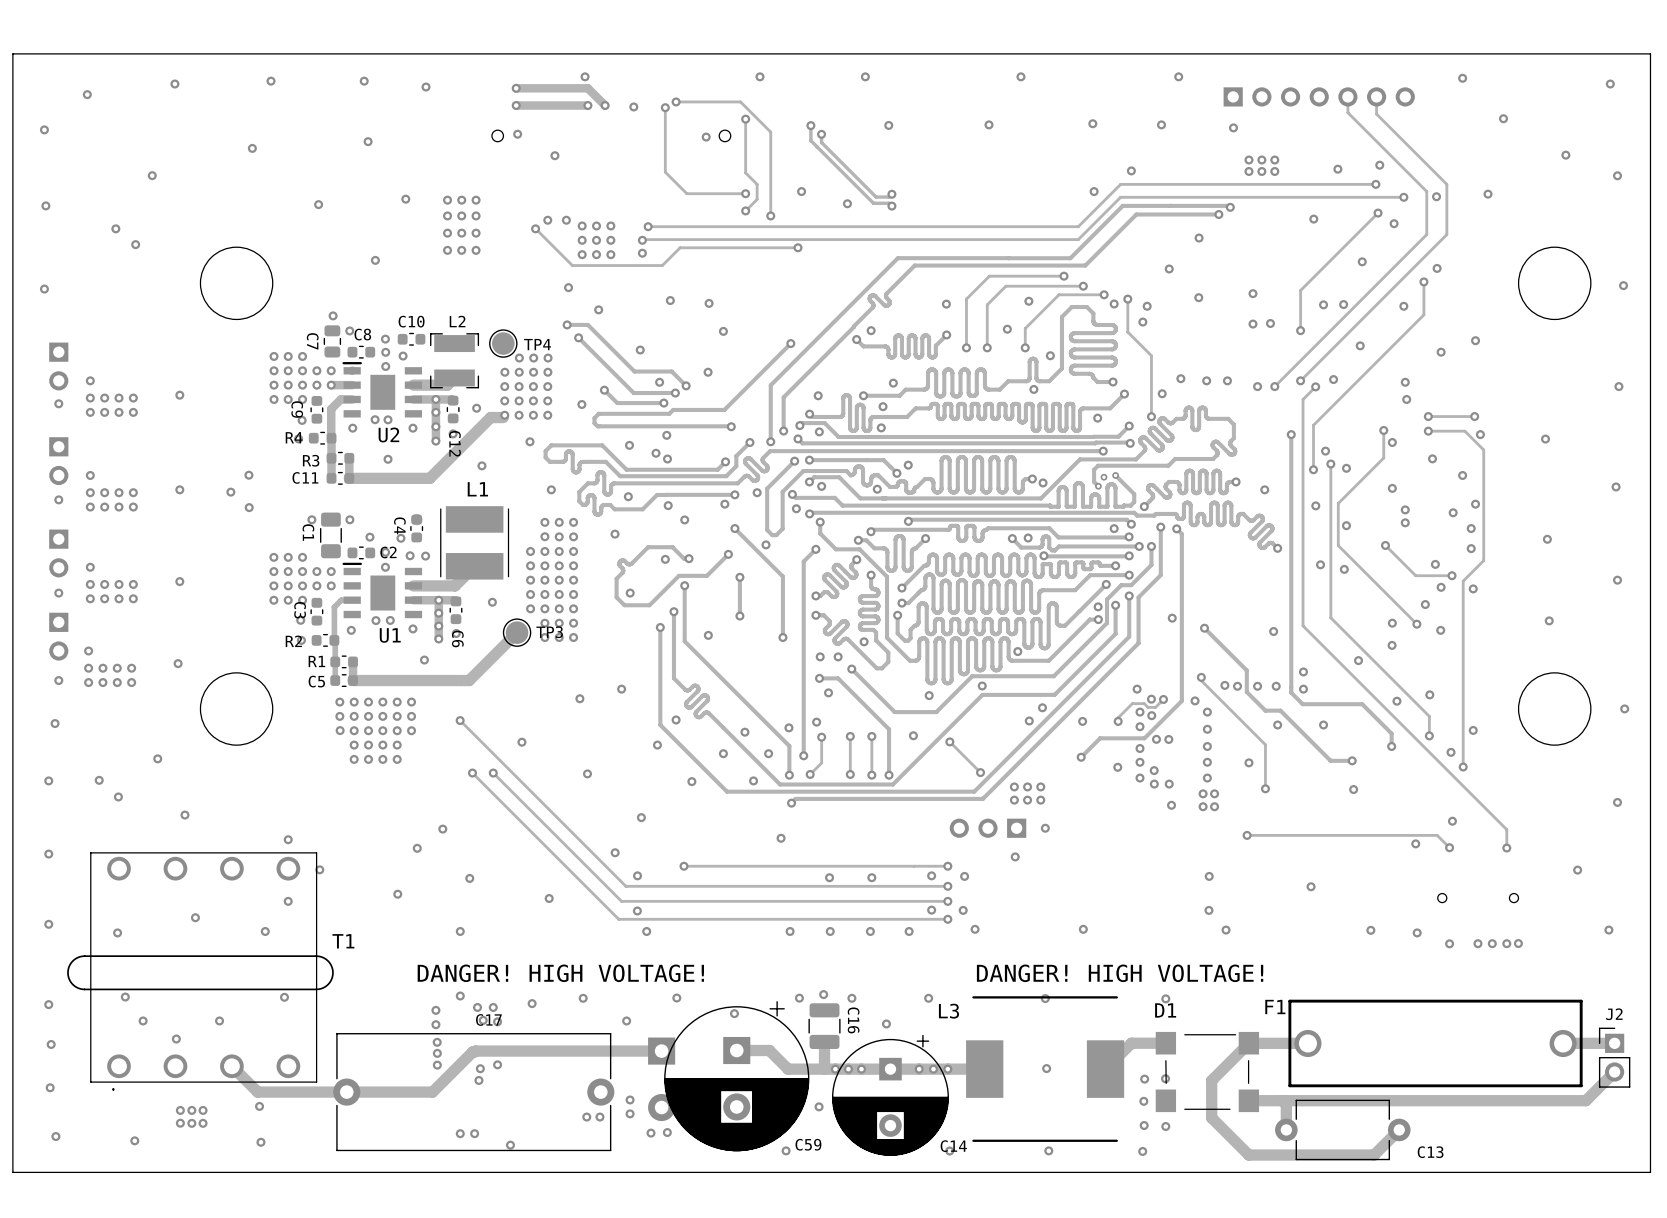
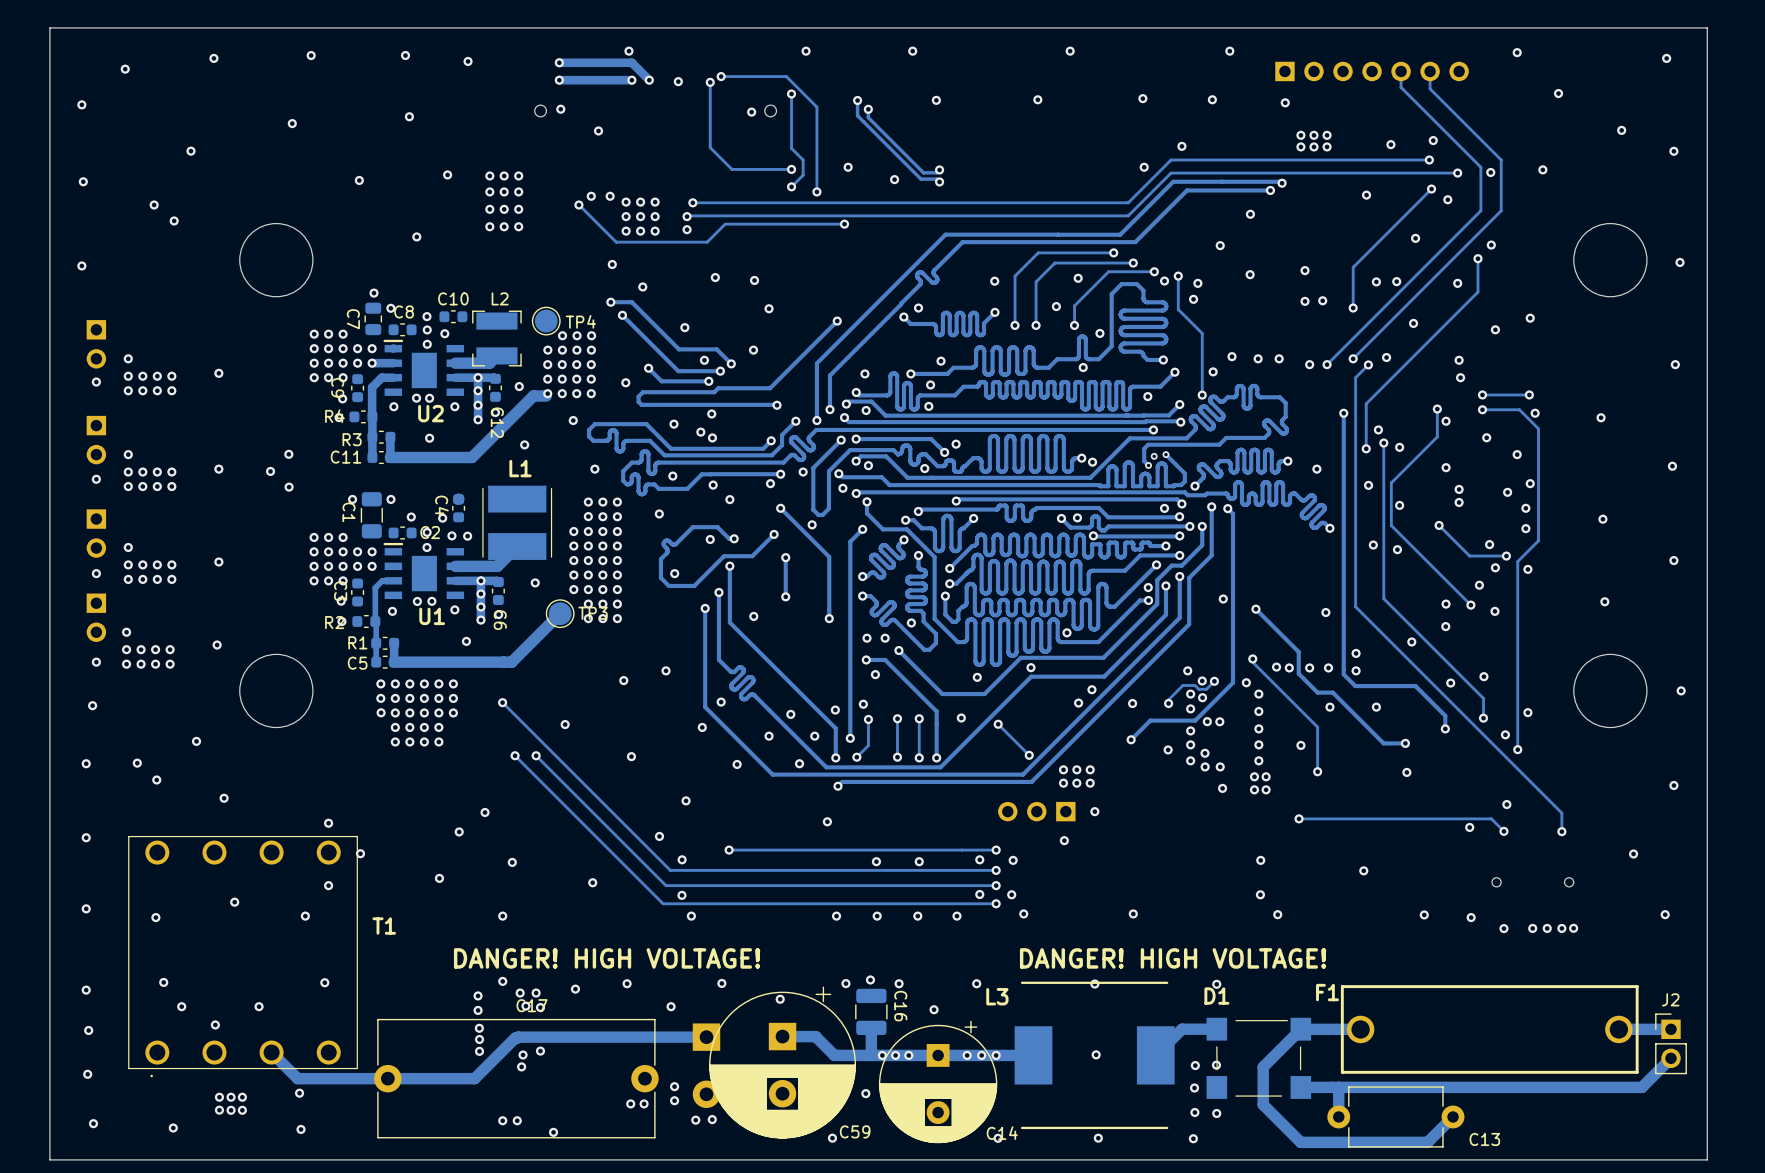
board edge: (316, 956) (82, 956) (71, 962) (68, 974) (74, 985) (84, 989) (318, 989) (329, 982) (332, 972) (328, 961) (316, 956) -> none

